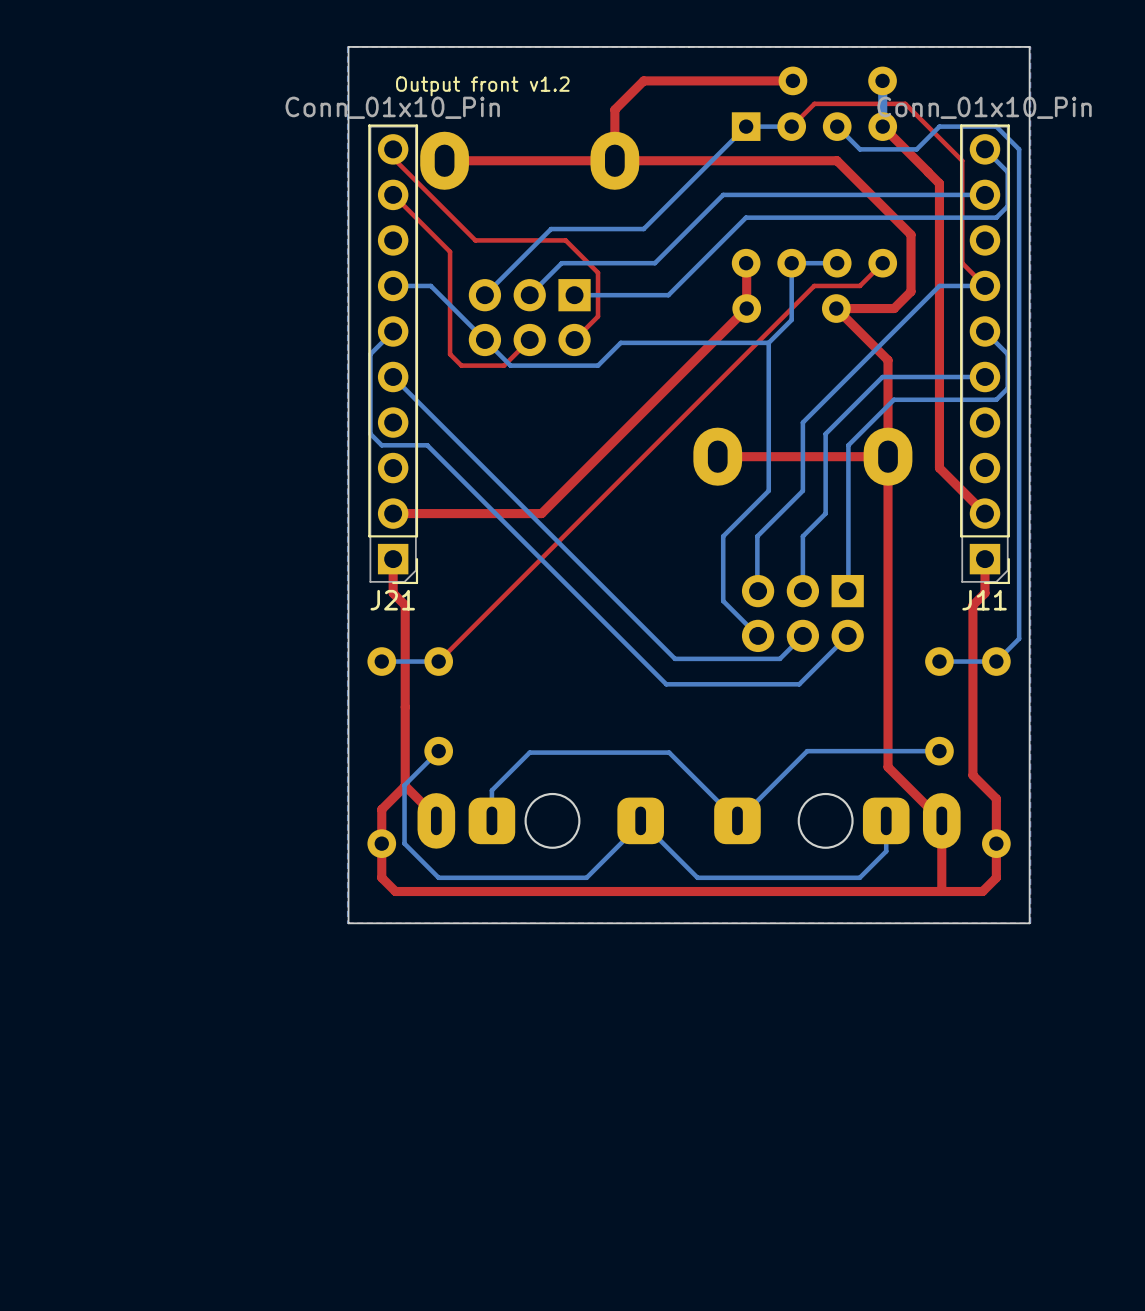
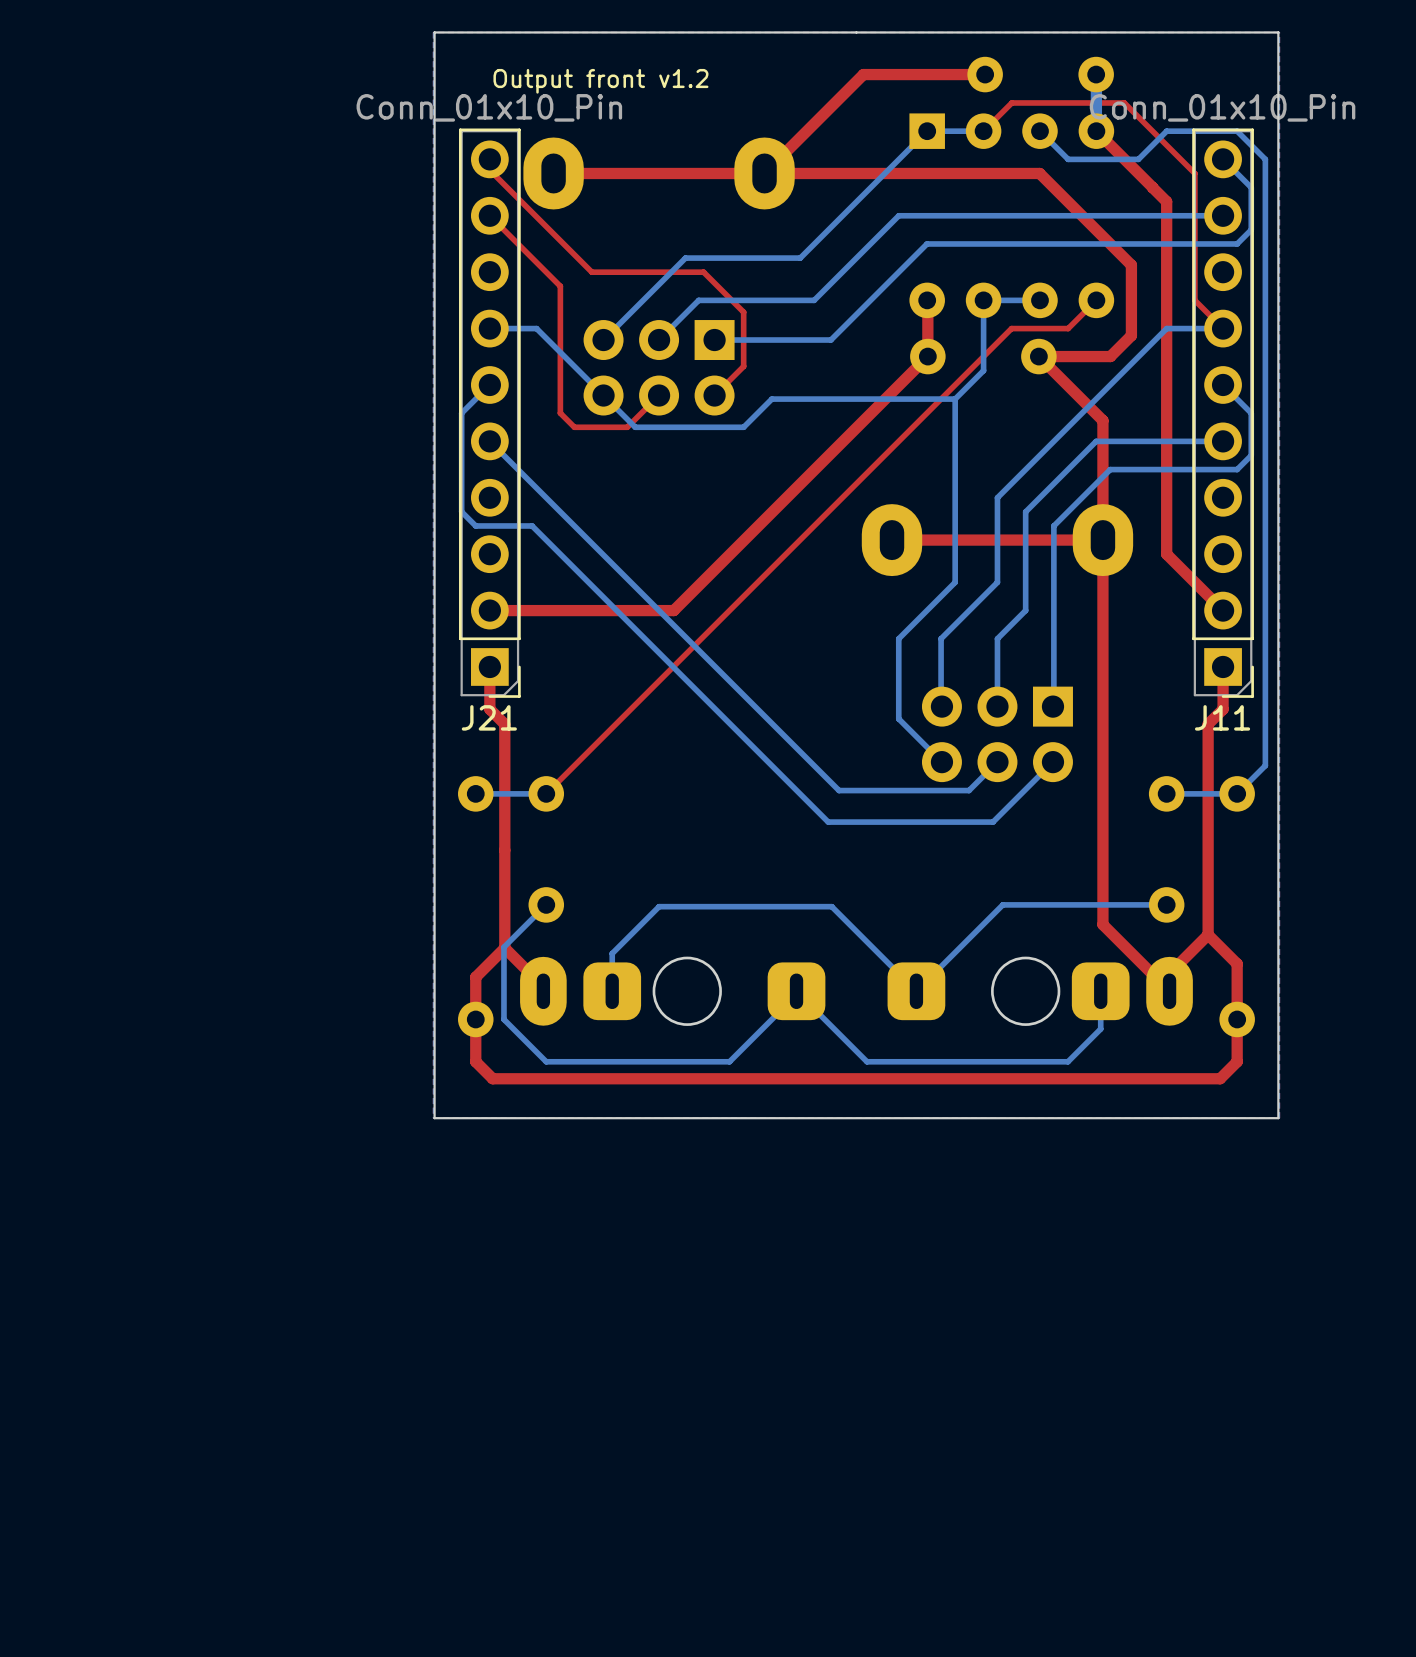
top track: (694, 80) (643, 80) (614, 109) (614, 160) -> (863, 74) (764, 173)
top track: none -> (1208, 934) (1169, 973)
top track: (941, 820) (941, 891) -> none

